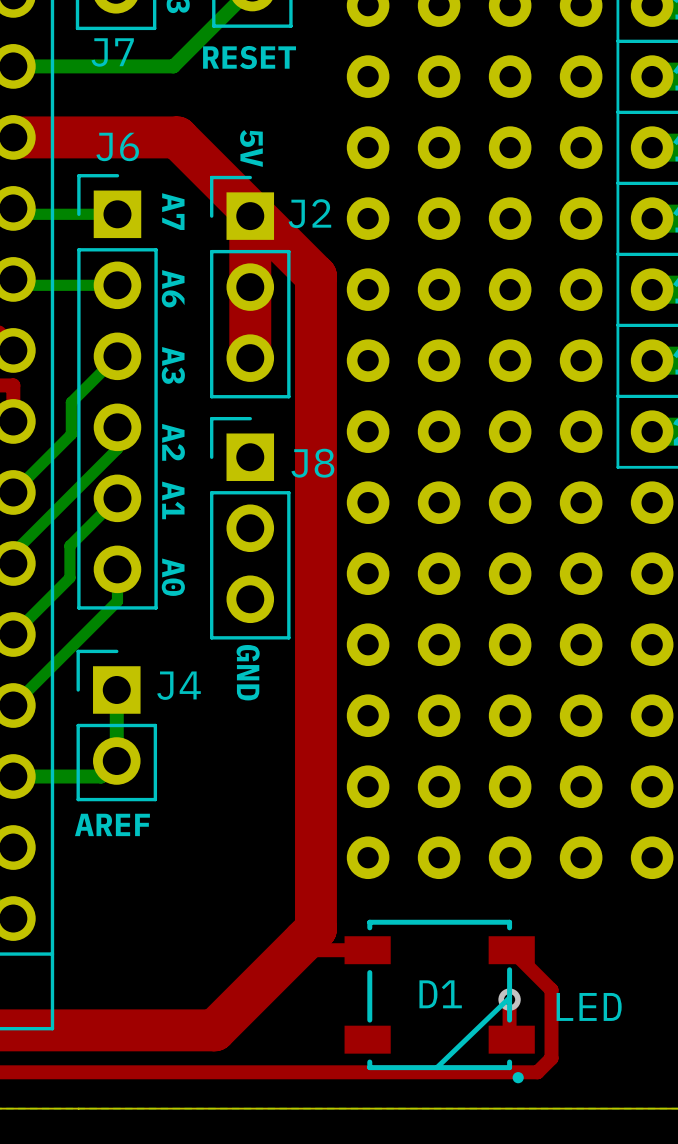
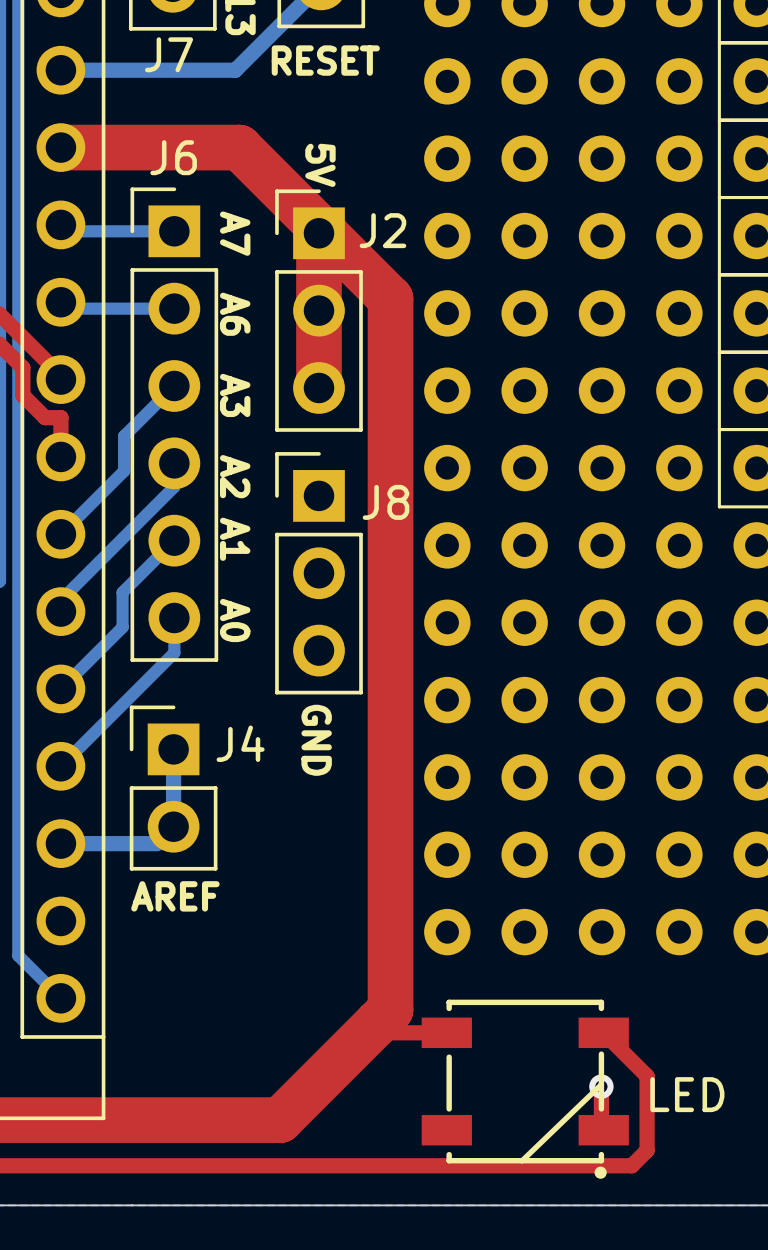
D1: (439, 1001) -> none
part: none -> (525, 1089)

